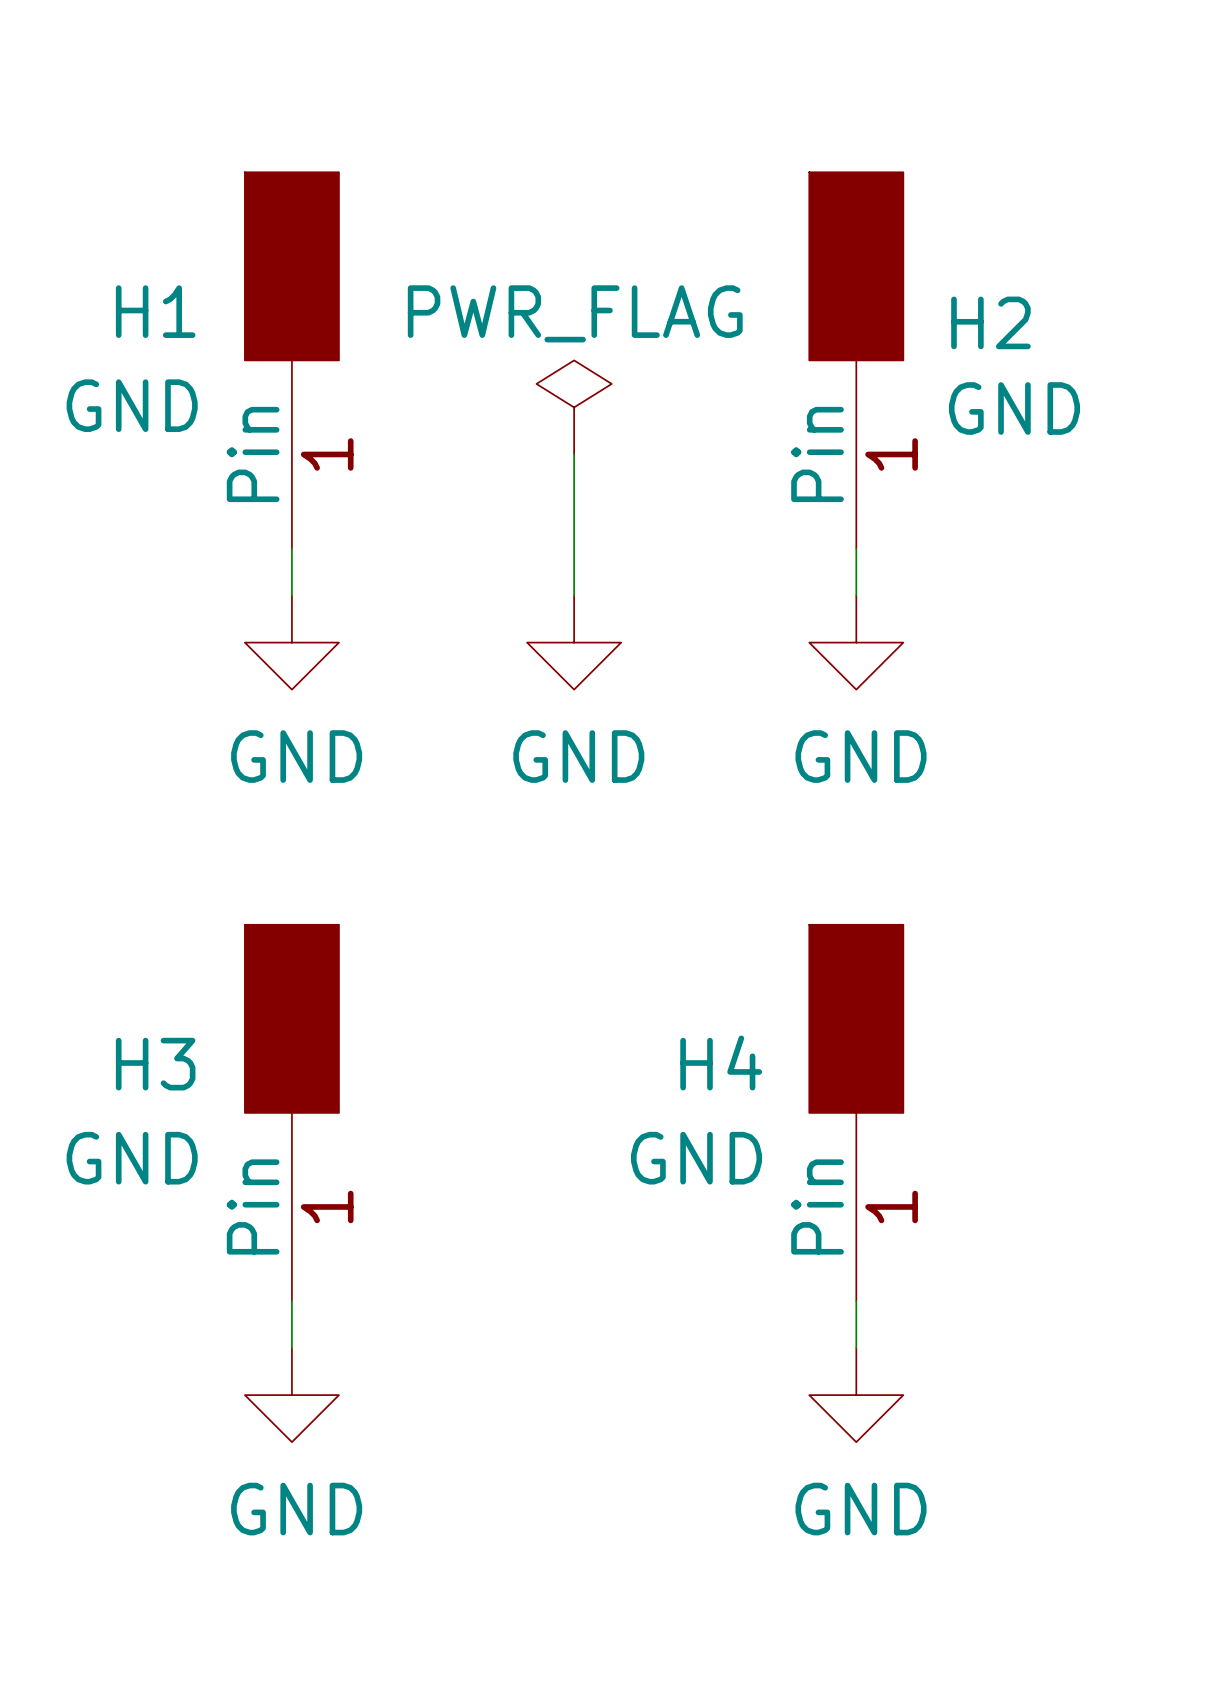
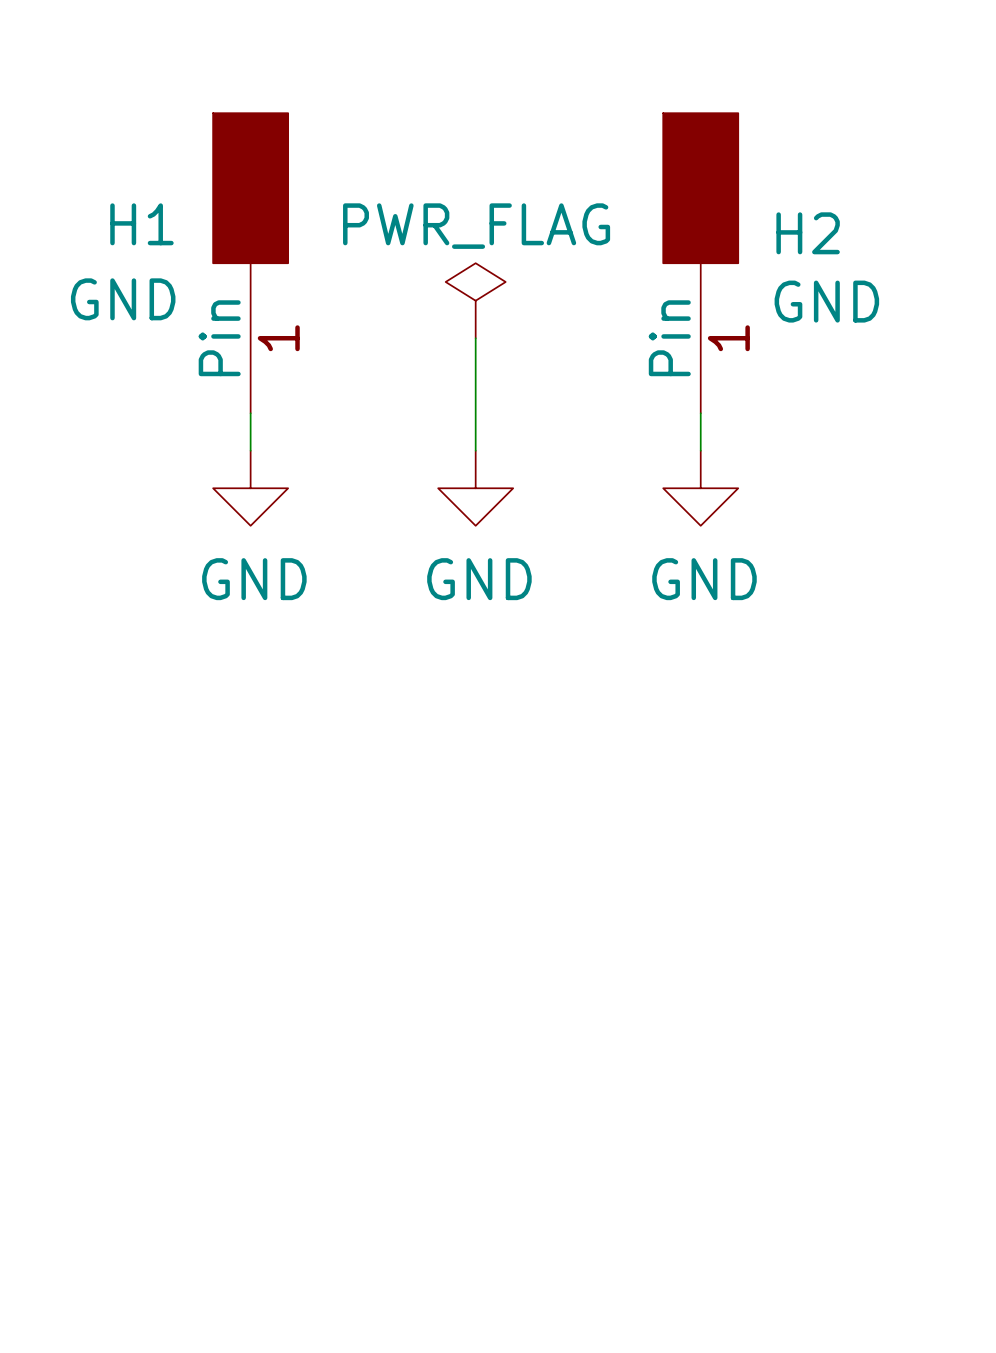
H3: GND (291, 1112) -> none
H4: GND (856, 1112) -> none
wire: (291, 1301) (291, 1348) -> none
wire: (856, 1301) (856, 1348) -> none
power symbol: GND (291, 1395) -> none
power symbol: GND (856, 1395) -> none

